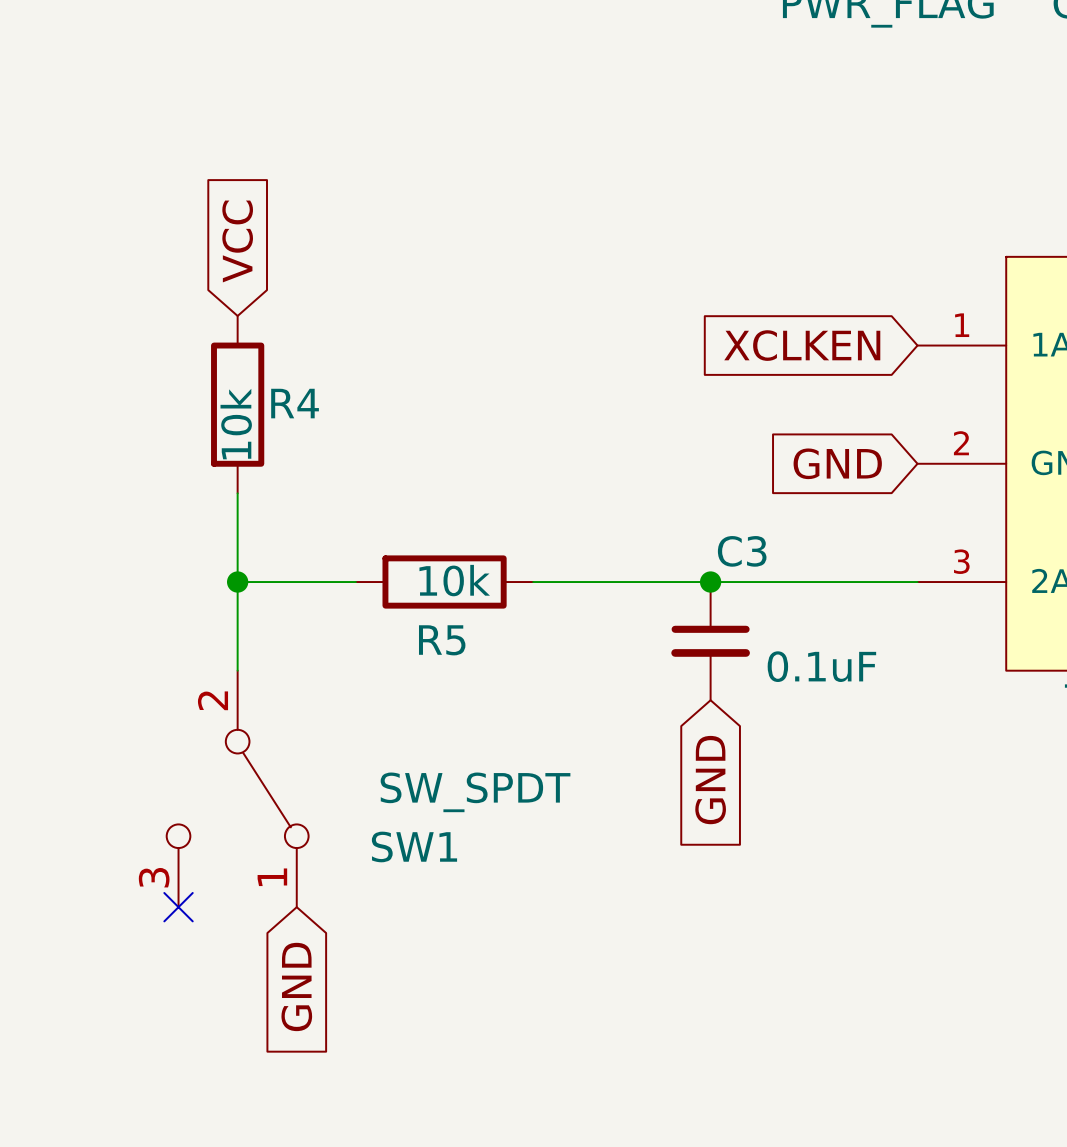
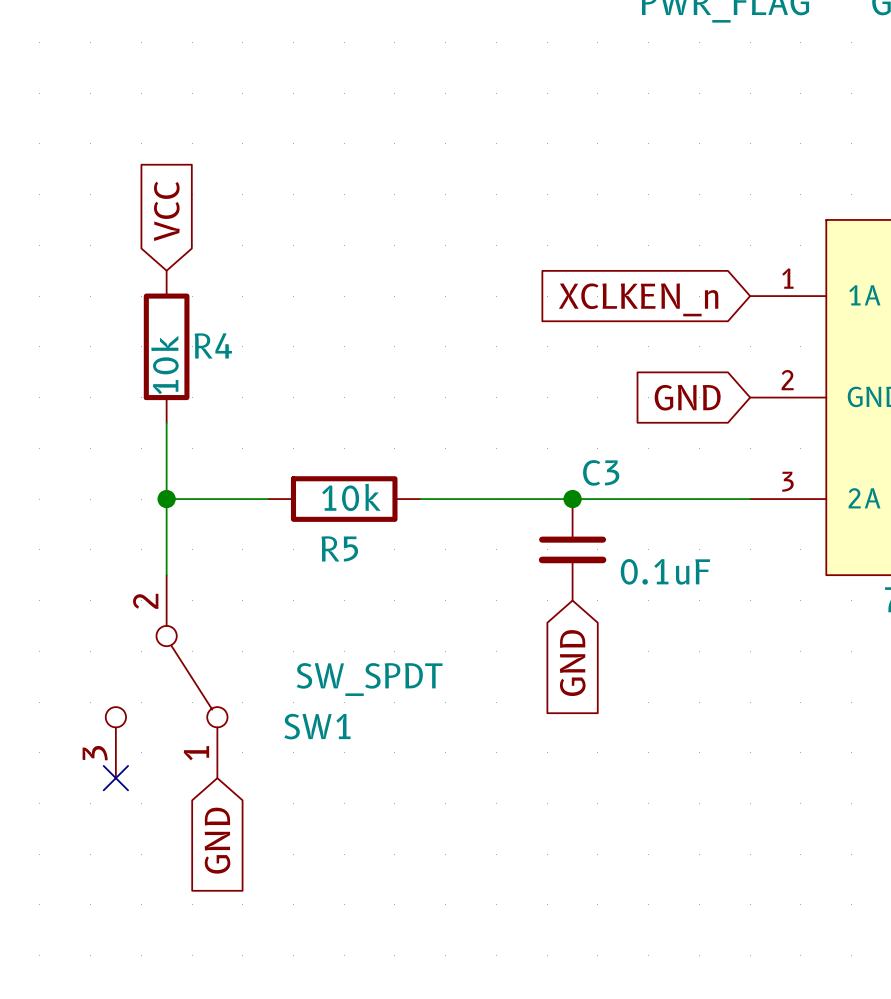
global label: XCLKEN (802, 345) -> XCLKEN_n (638, 299)

